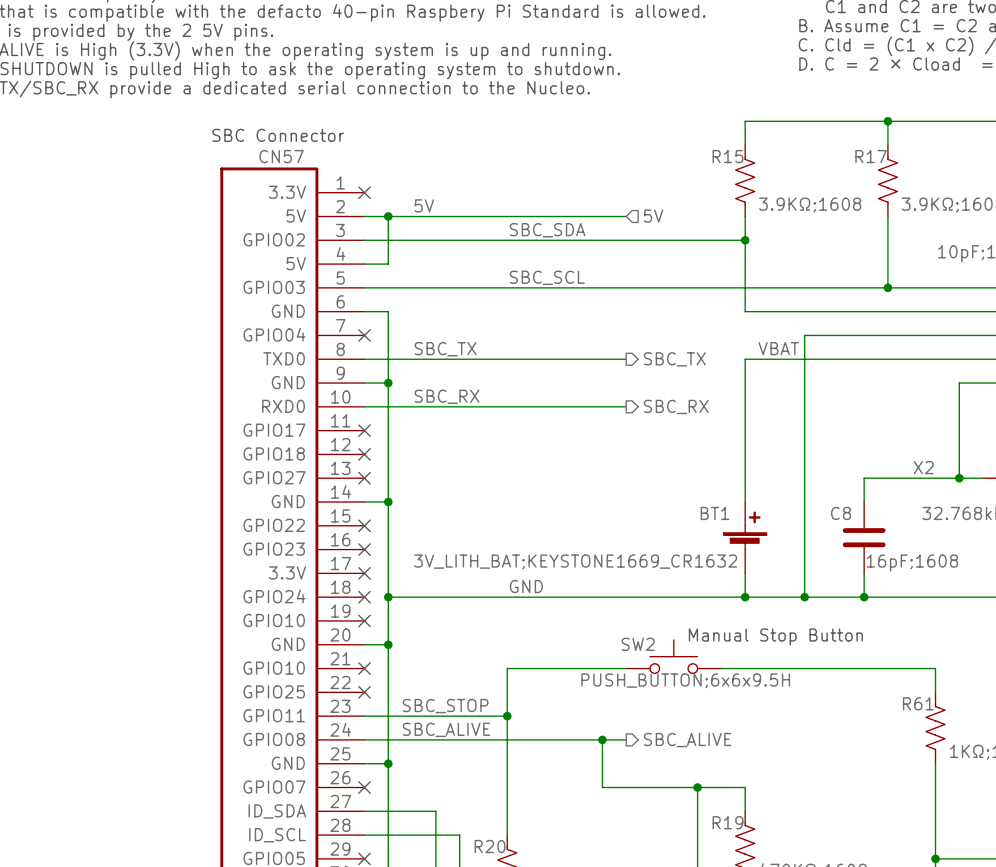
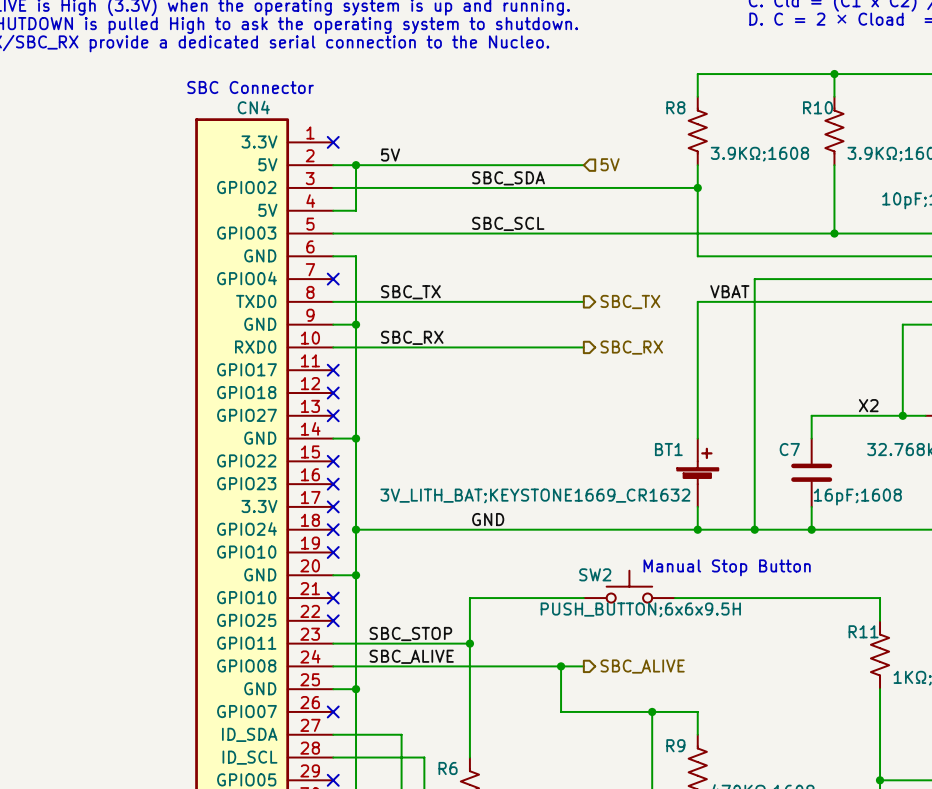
CN57 name: CN57 (281, 156) -> CN4 (253, 107)
R15 name: R15 (727, 156) -> R8 (675, 107)
R17 name: R17 (871, 156) -> R10 (817, 107)
C8 name: C8 (841, 513) -> C7 (789, 449)
R61 name: R61 (918, 703) -> R11 (863, 631)
R19 name: R19 (727, 822) -> R9 (675, 745)
R20 name: R20 (490, 846) -> R6 (448, 768)

